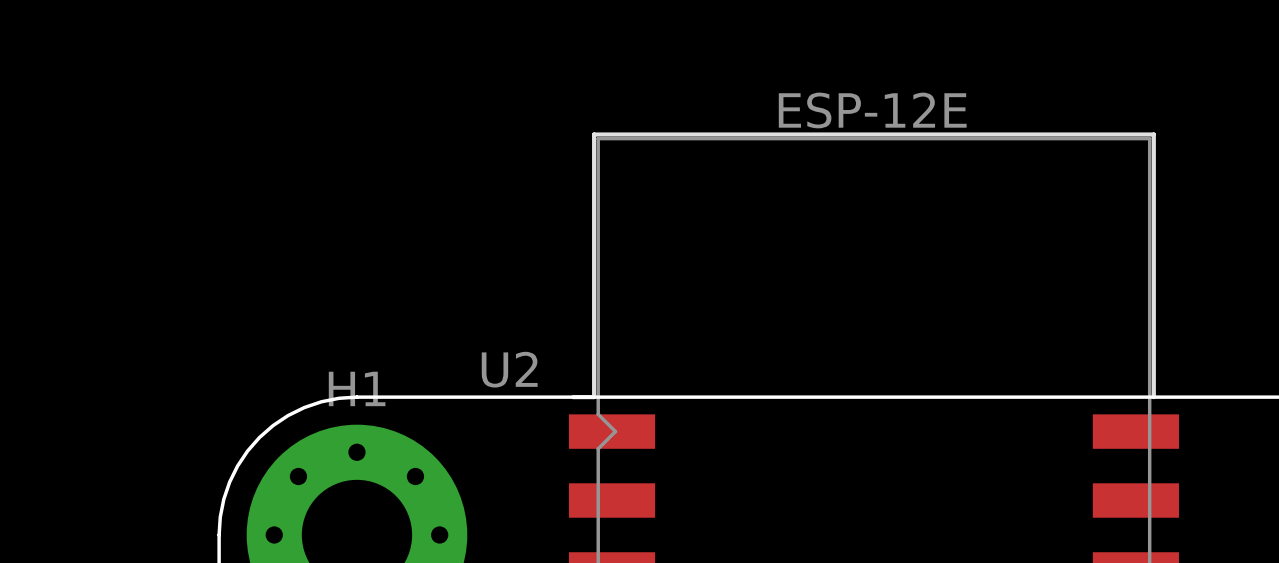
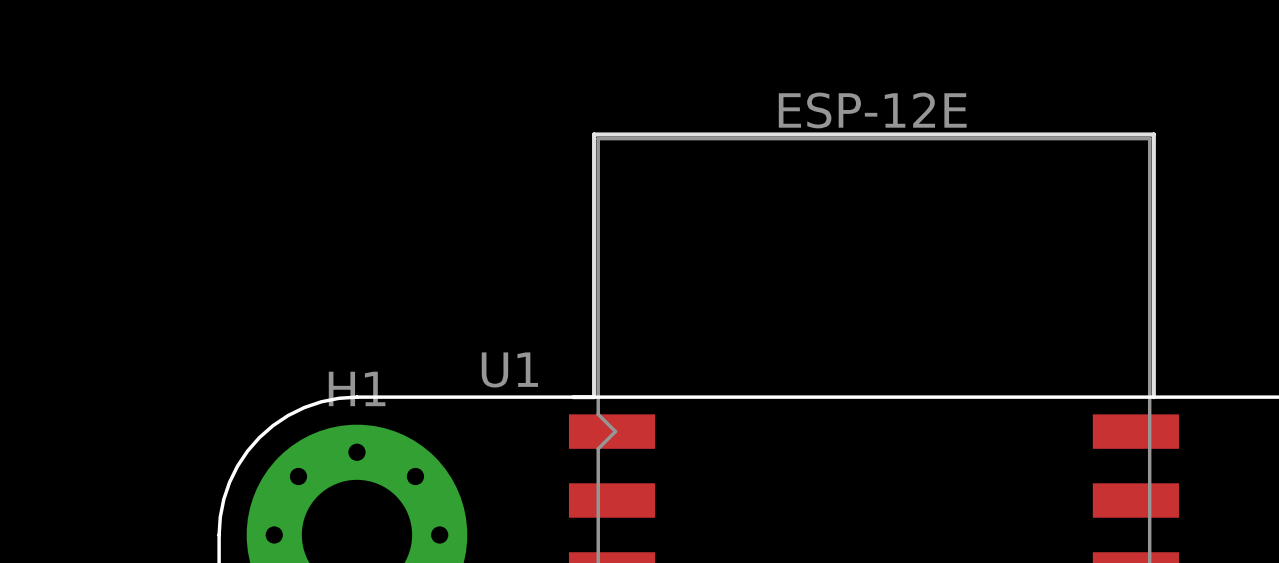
U2 name: U2 (509, 369) -> U1 (509, 369)

